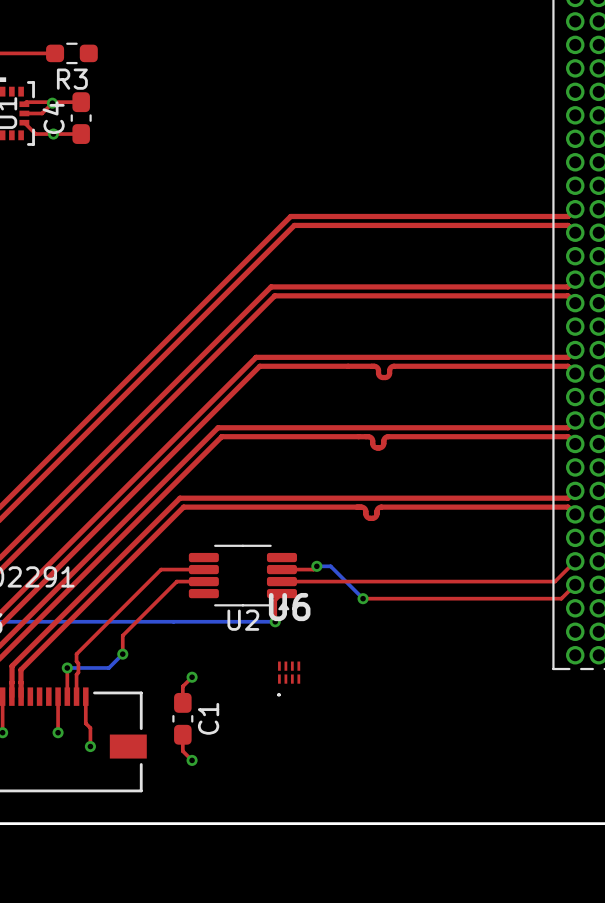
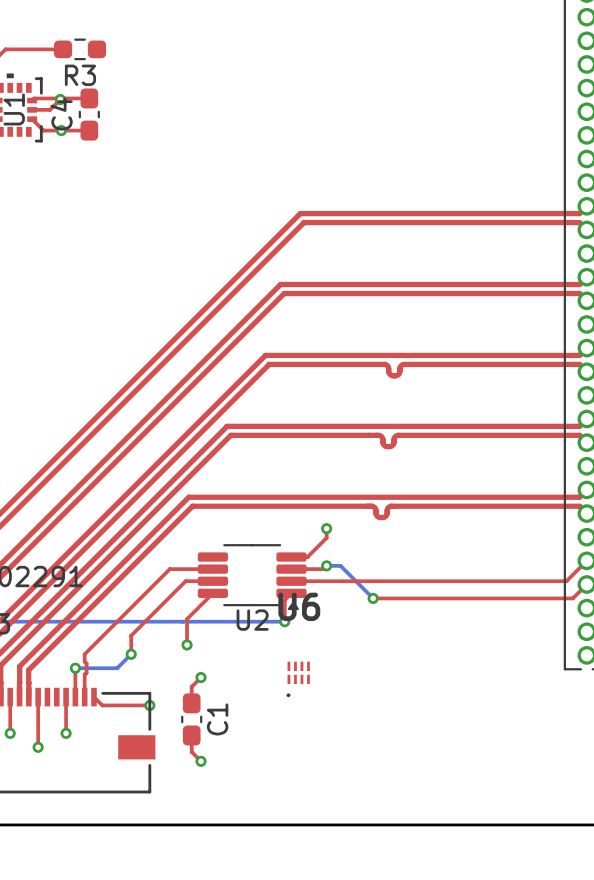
top track: none -> (326, 528) (326, 537) (307, 557) (291, 557)
via: none -> (326, 528)
top track: none -> (212, 593) (187, 619) (187, 644)
via: none -> (187, 644)
top track: none -> (38, 697) (38, 747)
top track: (85, 696) (85, 723) (90, 728) (90, 746) -> (93, 697) (102, 705) (149, 705)
via: none -> (149, 705)
via: none -> (38, 747)
via: (90, 746) -> none

